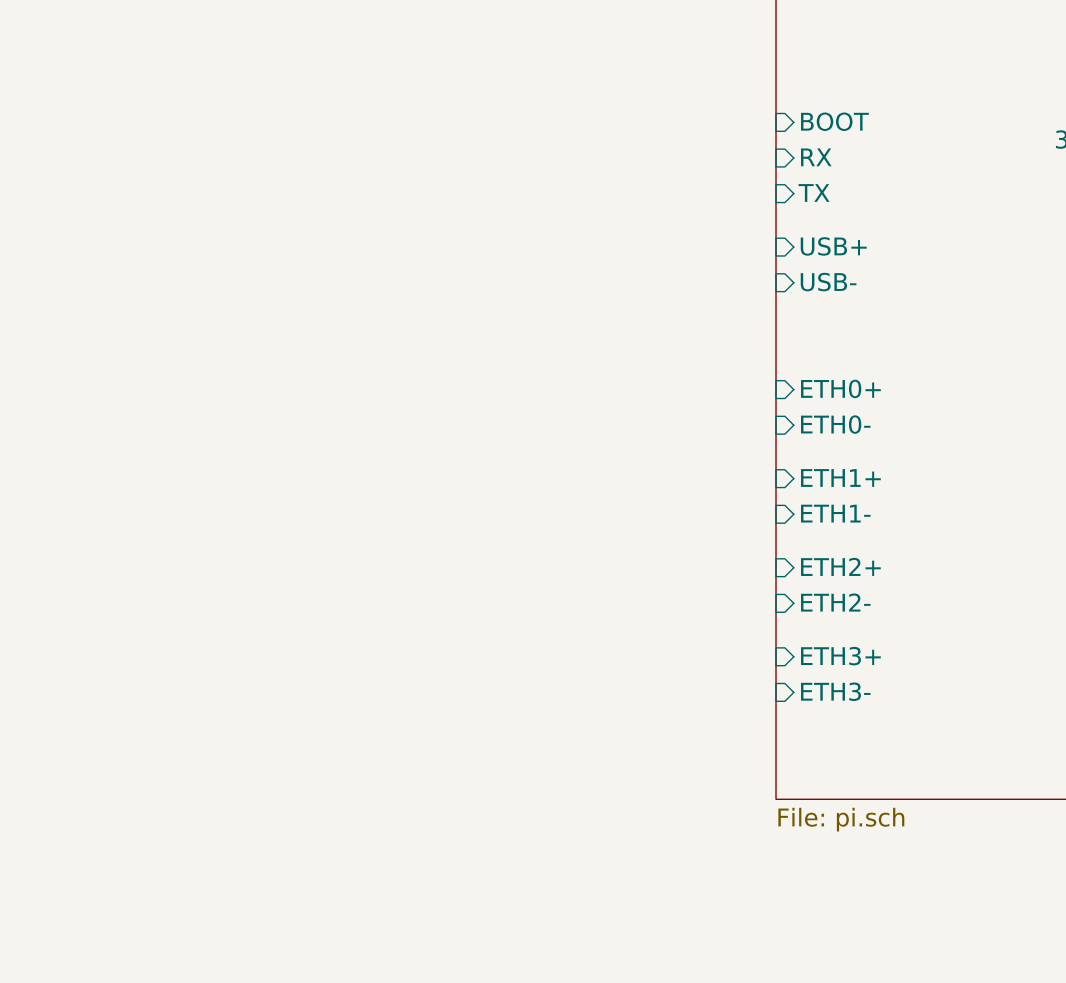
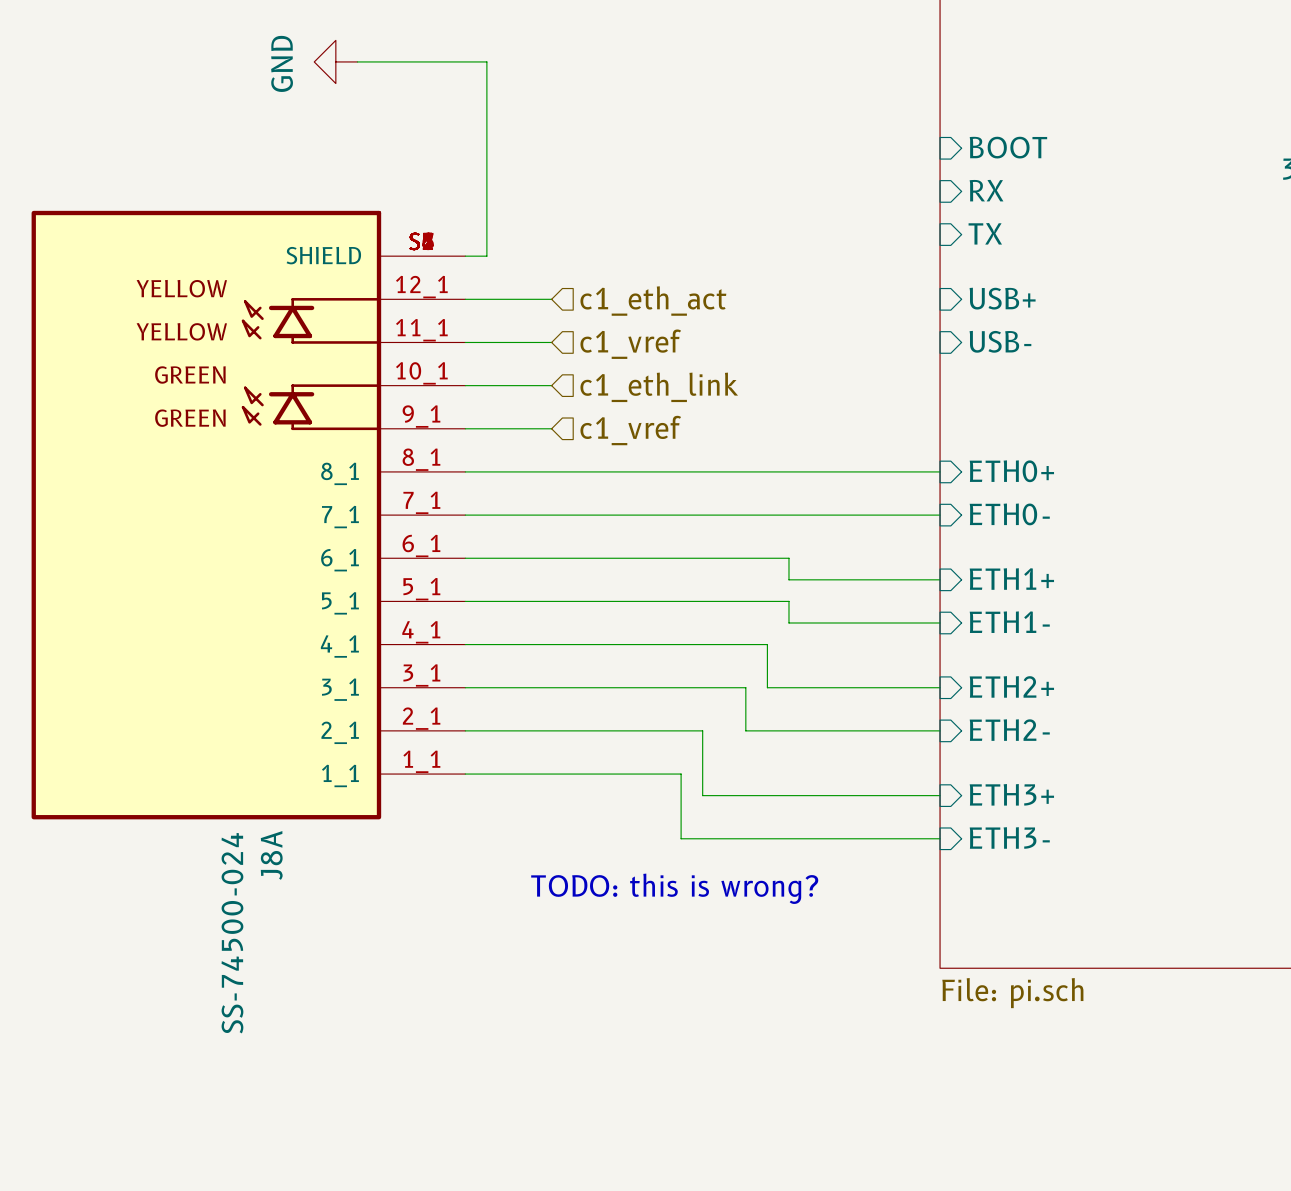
power symbol: none -> GND (335, 61)
wire: none -> (357, 61) (486, 61) (486, 256) (465, 256)
wire: none -> (465, 299) (551, 299)
hierarchical label: none -> c1_eth_act (653, 301)
wire: none -> (465, 342) (551, 342)
hierarchical label: none -> c1_vref (630, 344)
wire: none -> (465, 385) (551, 385)
hierarchical label: none -> c1_eth_link (659, 387)
wire: none -> (465, 428) (551, 428)
hierarchical label: none -> c1_vref (630, 430)
wire: none -> (465, 471) (940, 471)
J8A: none -> SS-74500-024 (248, 515)
wire: none -> (465, 515) (940, 515)
wire: none -> (465, 558) (788, 558) (788, 579) (940, 579)
wire: none -> (465, 601) (788, 601) (788, 622) (940, 622)
wire: none -> (465, 644) (767, 644) (767, 687) (940, 687)
wire: none -> (465, 687) (745, 687) (745, 730) (940, 730)
wire: none -> (465, 730) (702, 730) (702, 795) (940, 795)
wire: none -> (465, 774) (681, 774) (681, 838) (940, 838)
text: none -> TODO: this is wrong? (674, 888)

